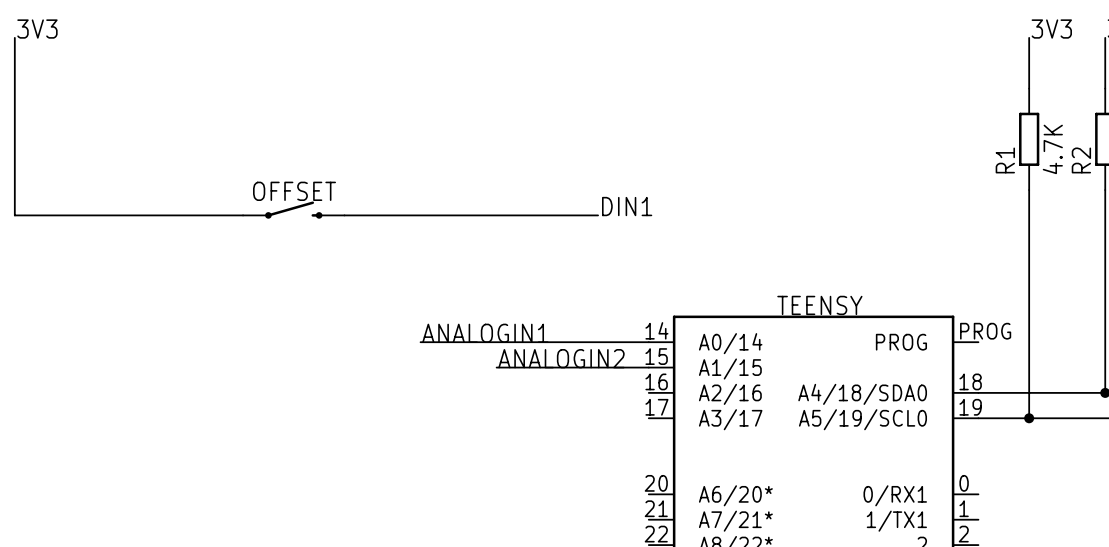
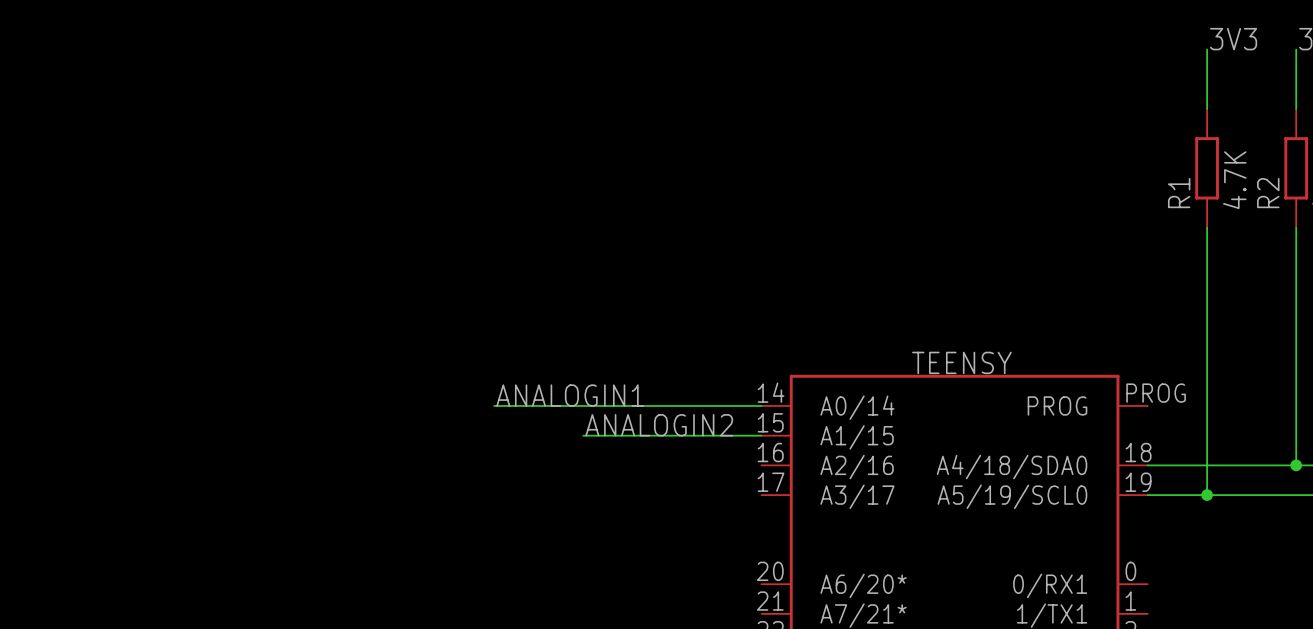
label: 3V3 (37, 29) -> none
wire: (14, 37) (14, 215) (243, 215) -> none
label: DIN1 (627, 206) -> none
OFFSET: (293, 210) -> none
wire: (344, 215) (598, 215) -> none

